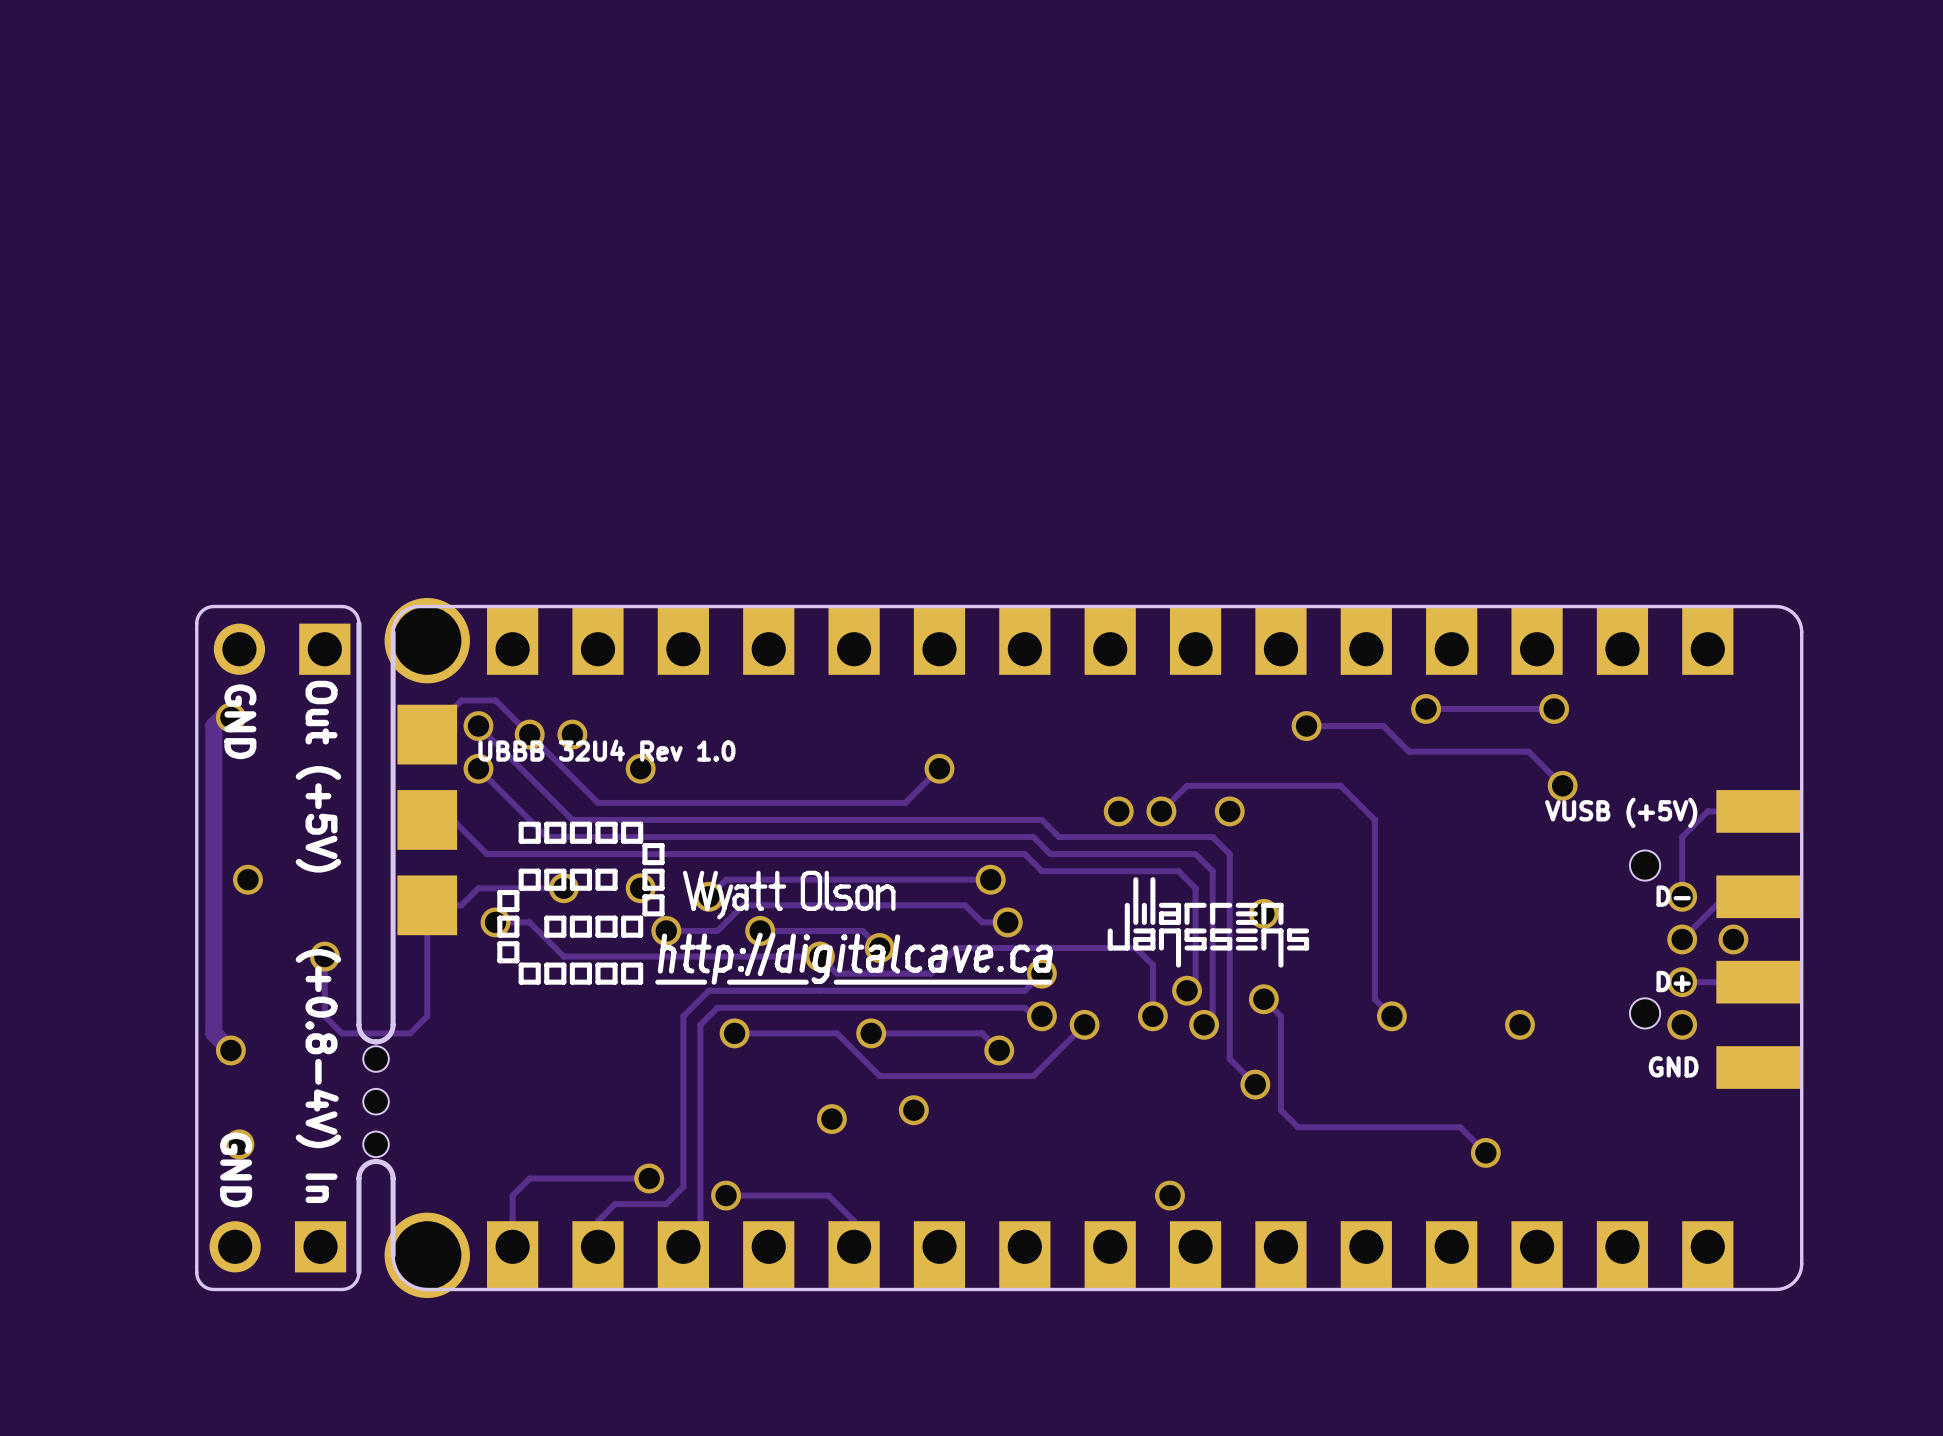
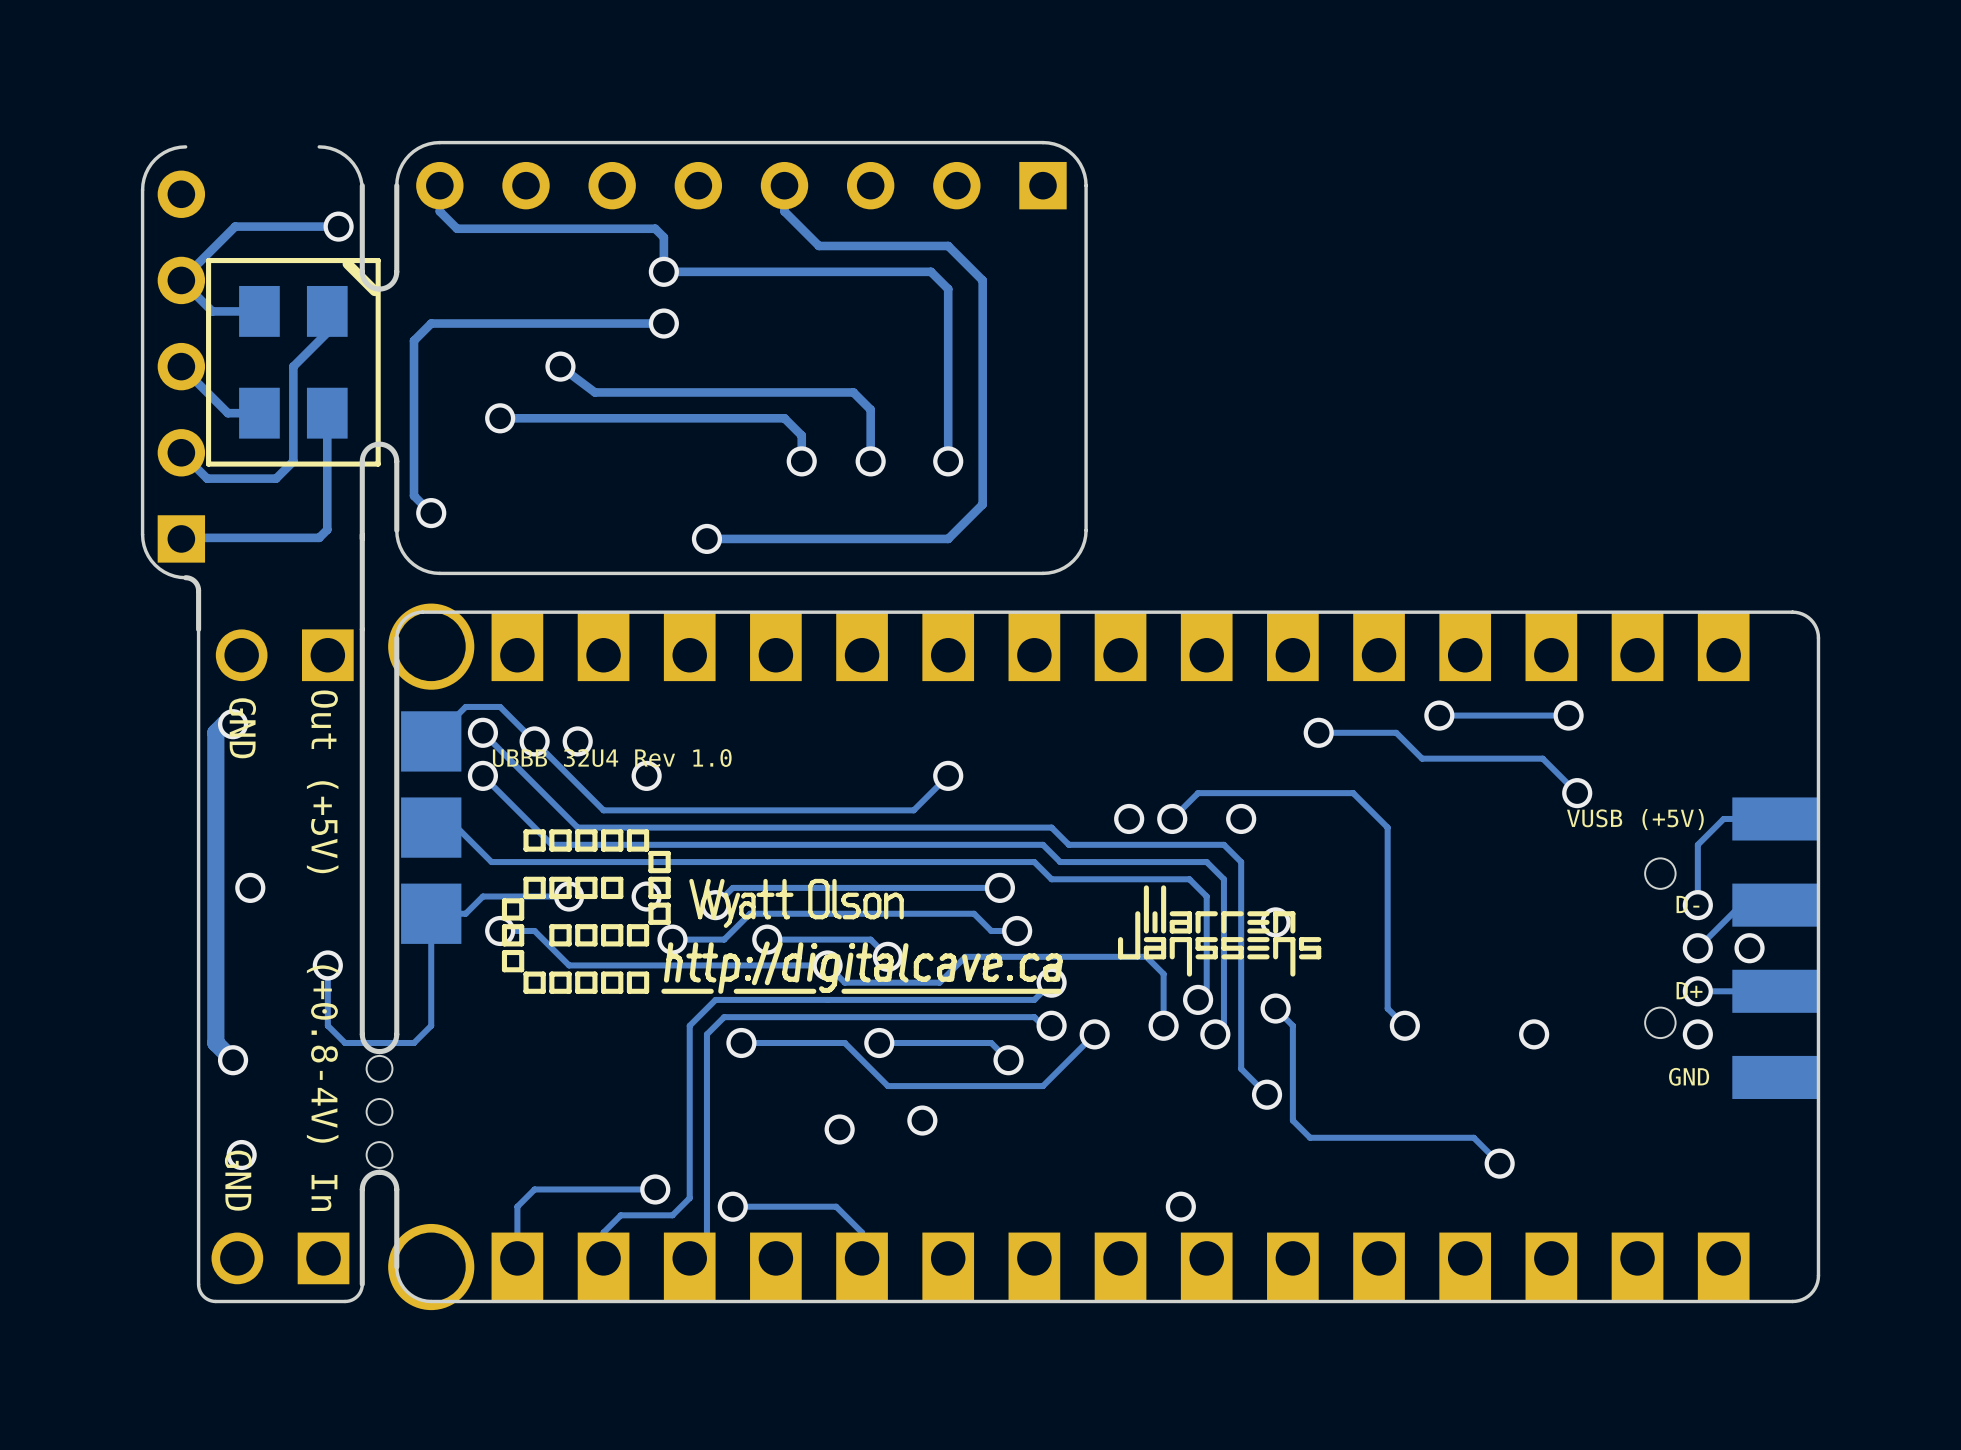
board edge: none -> (185, 146) (169, 150) (155, 159) (145, 173) (142, 184) (142, 534) (145, 551) (155, 565) (169, 574) (190, 578) (196, 584) (198, 629)
board edge: none -> (319, 146) (335, 150) (349, 159) (359, 173) (362, 189)
track: none -> (439, 185) (439, 211) (457, 228) (655, 228) (663, 237) (663, 271) (930, 271) (948, 289) (948, 461)
part: none -> (741, 185)
track: none -> (784, 185) (784, 211) (818, 245) (948, 245) (982, 280) (982, 504) (948, 538) (706, 538)
track: none -> (338, 226) (235, 226) (181, 280) (212, 311) (259, 311)
via: none -> (338, 226)
via: none -> (663, 271)
track: none -> (327, 311) (327, 332) (293, 366) (293, 461) (276, 478) (207, 478) (181, 452)
track: none -> (663, 323) (431, 323) (414, 340) (414, 495) (431, 513)
via: none -> (663, 323)
part: none -> (293, 362)
track: none -> (181, 366) (227, 413) (259, 413)
part: none -> (181, 366)
track: none -> (560, 366) (594, 392) (853, 392) (870, 409) (870, 461)
via: none -> (560, 366)
track: none -> (327, 413) (327, 529) (319, 537) (181, 538)
track: none -> (500, 418) (784, 418) (801, 435) (801, 461)
via: none -> (500, 418)
via: none -> (801, 461)
via: none -> (870, 461)
via: none -> (948, 461)
via: none -> (431, 513)
via: none -> (706, 538)
board edge: (358, 623) (353, 611) (341, 606) (211, 606) (200, 613) (196, 623) -> (362, 629) (362, 459) (367, 449) (377, 444) (388, 446) (396, 456) (396, 530) (400, 546) (413, 564) (434, 573) (1042, 573) (1064, 567) (1080, 551) (1086, 530) (1086, 185) (1082, 169) (1073, 155) (1059, 145) (1042, 142) (434, 142) (413, 151) (400, 169) (396, 185) (396, 274) (391, 284) (379, 289) (367, 284) (362, 274) (362, 185)

